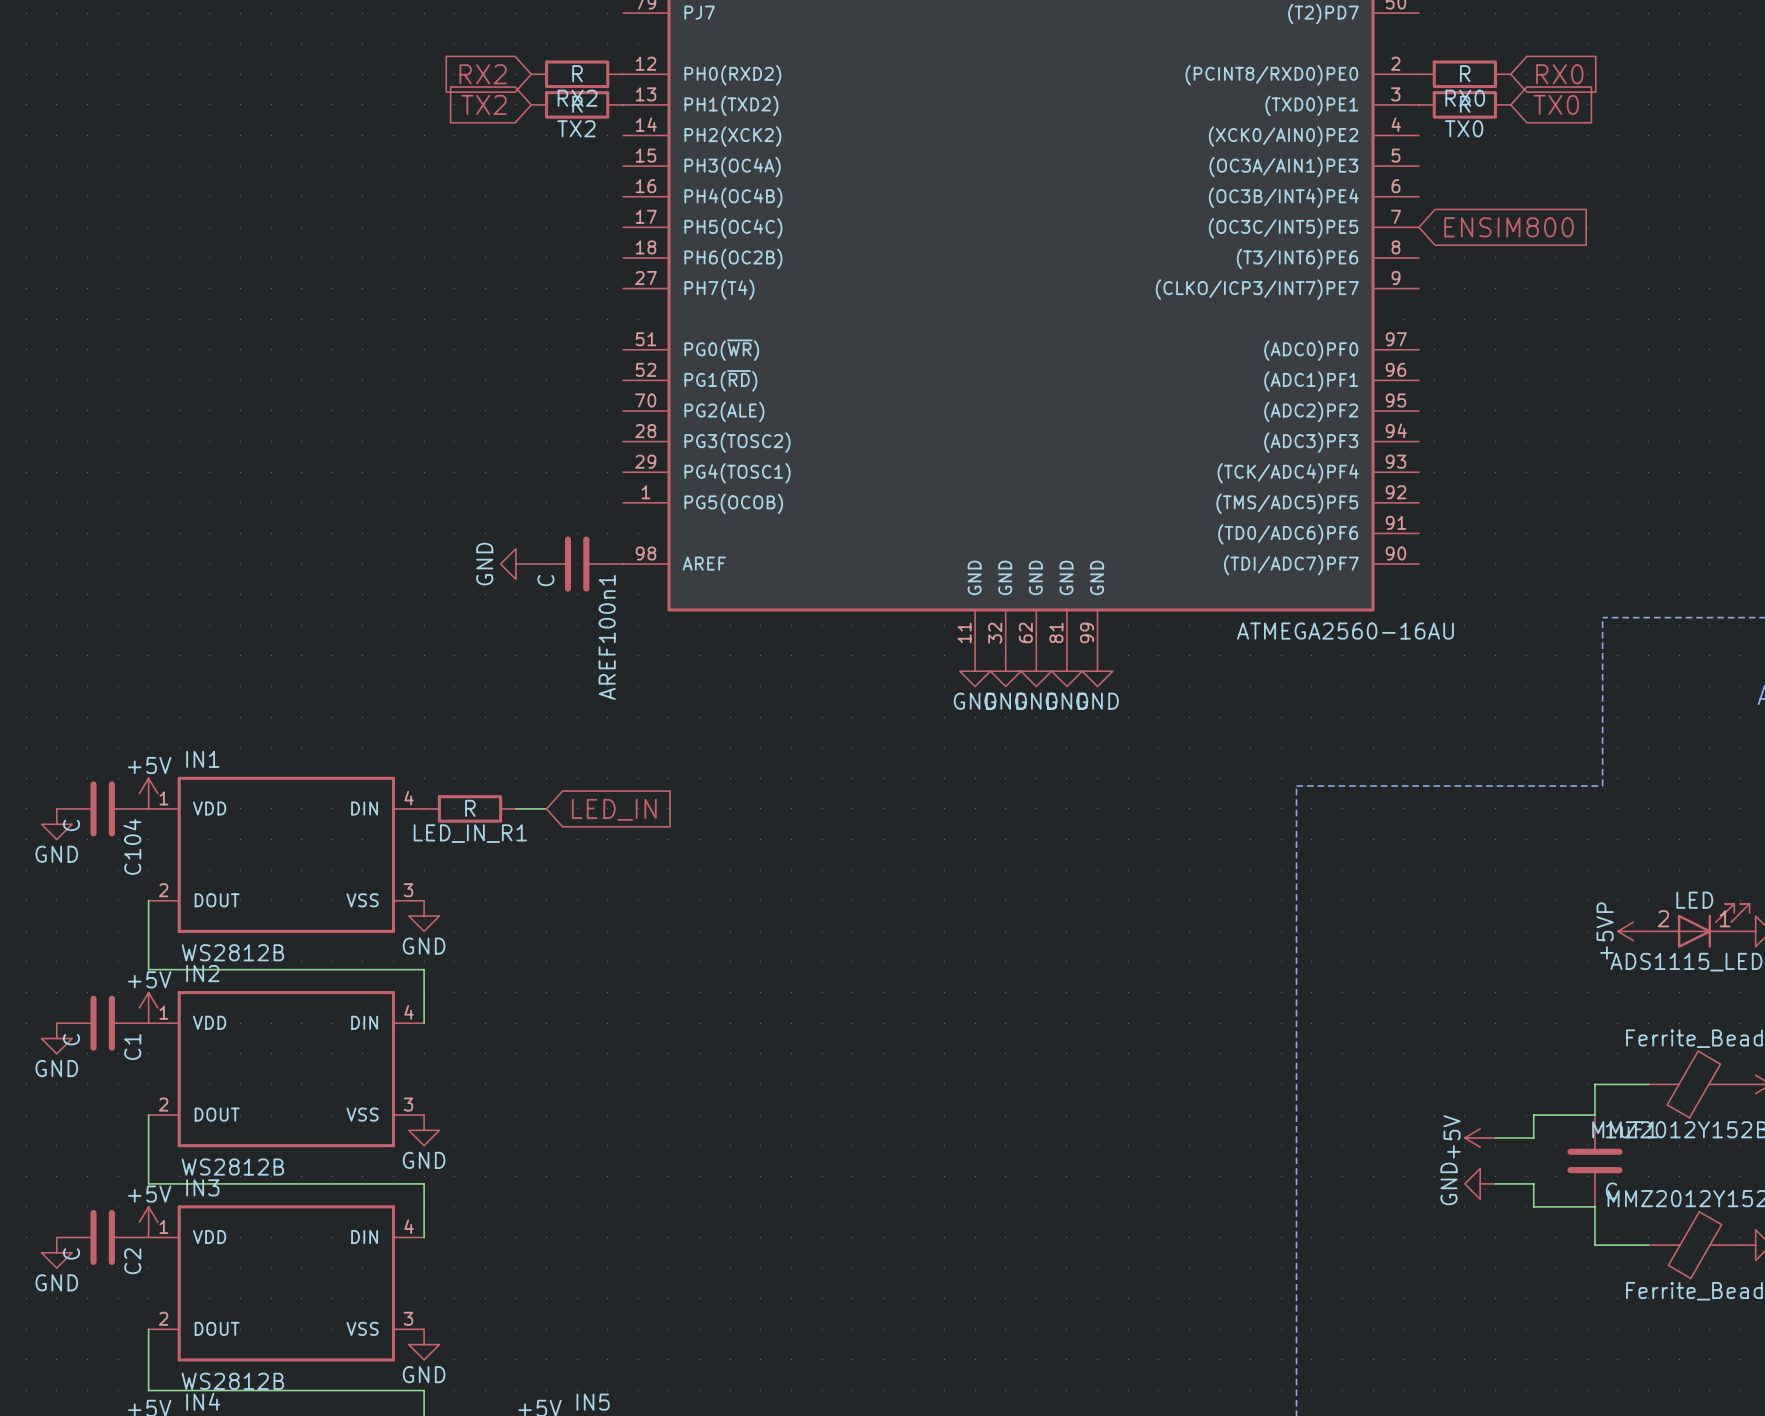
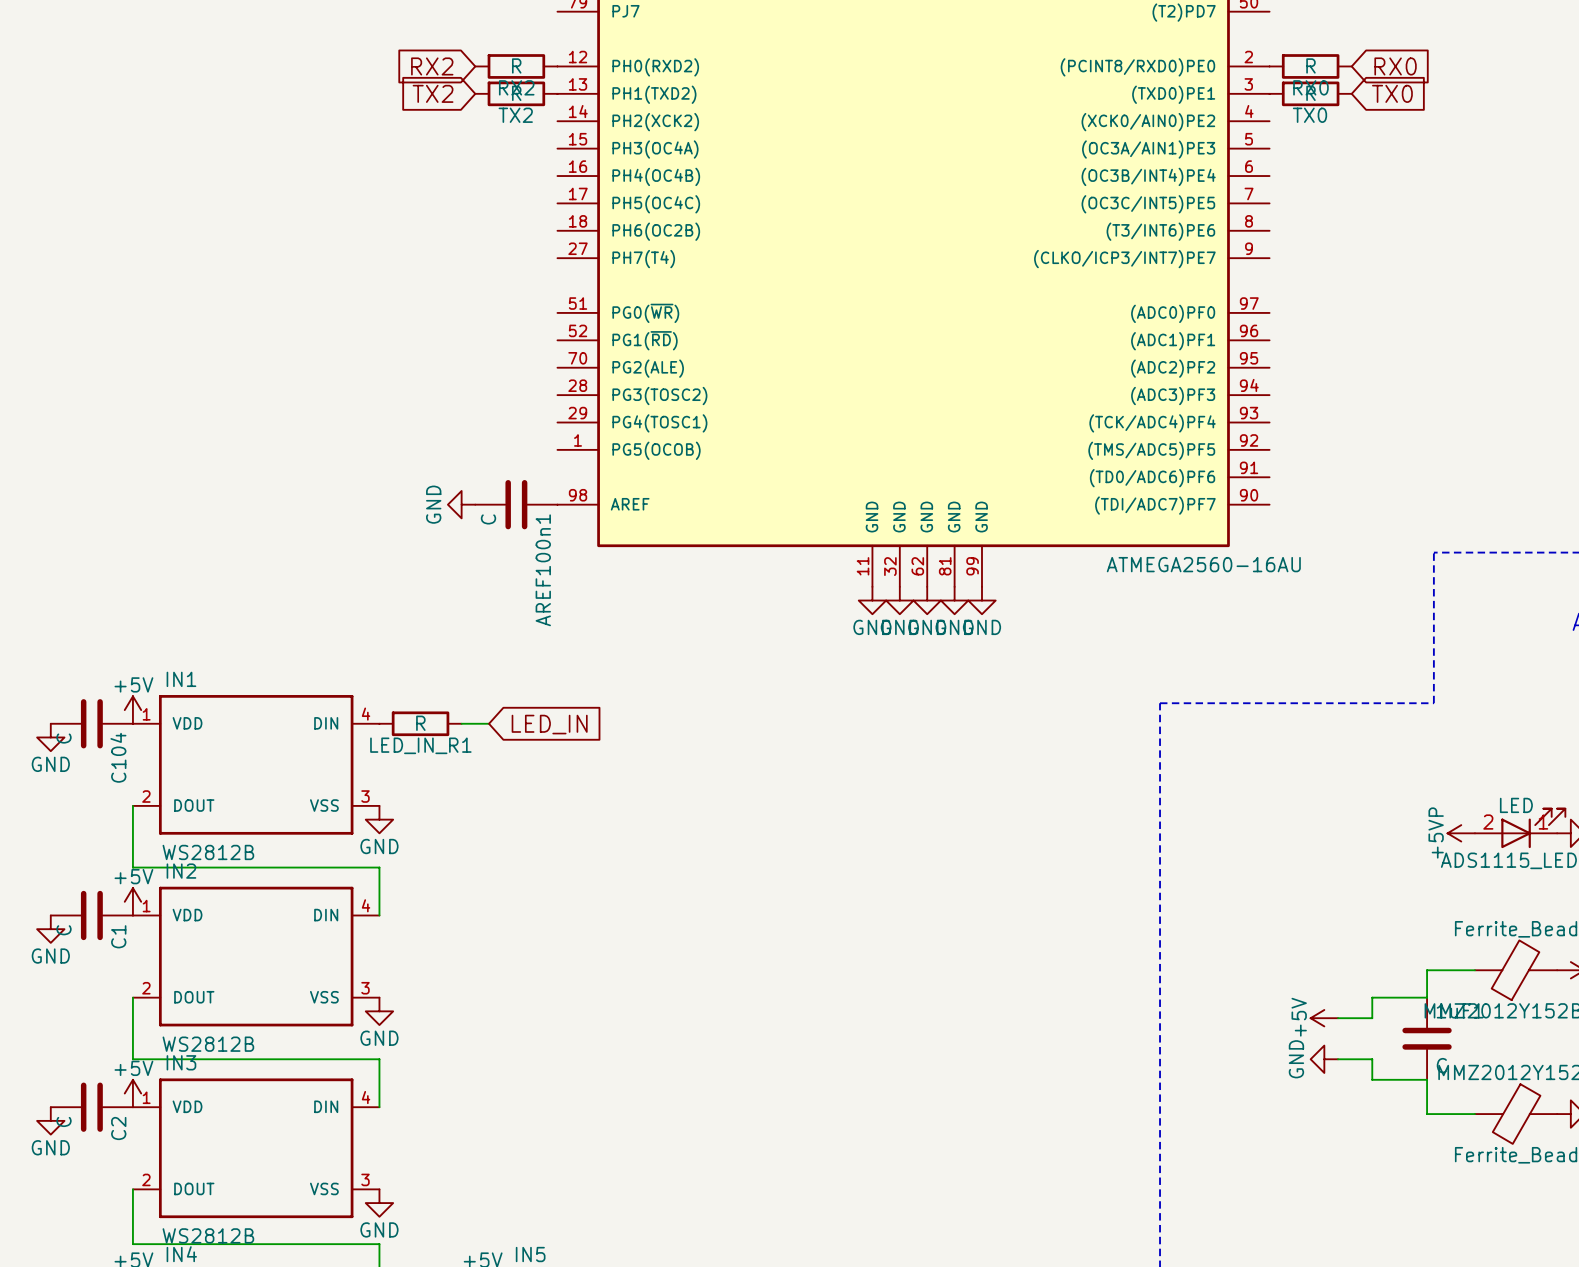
global label: ENSIM800 (1509, 227) -> none

